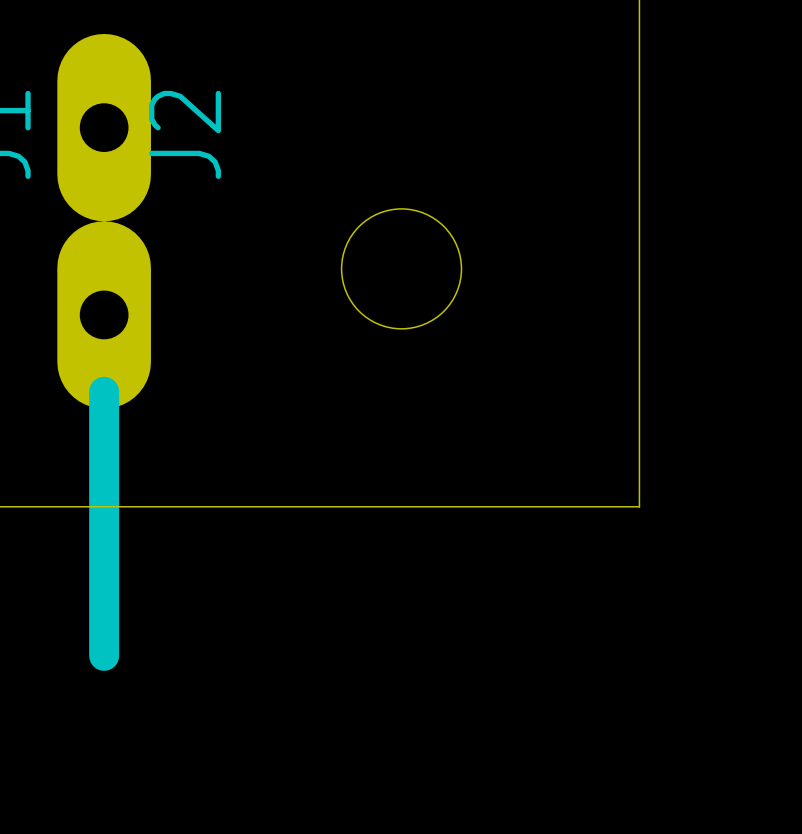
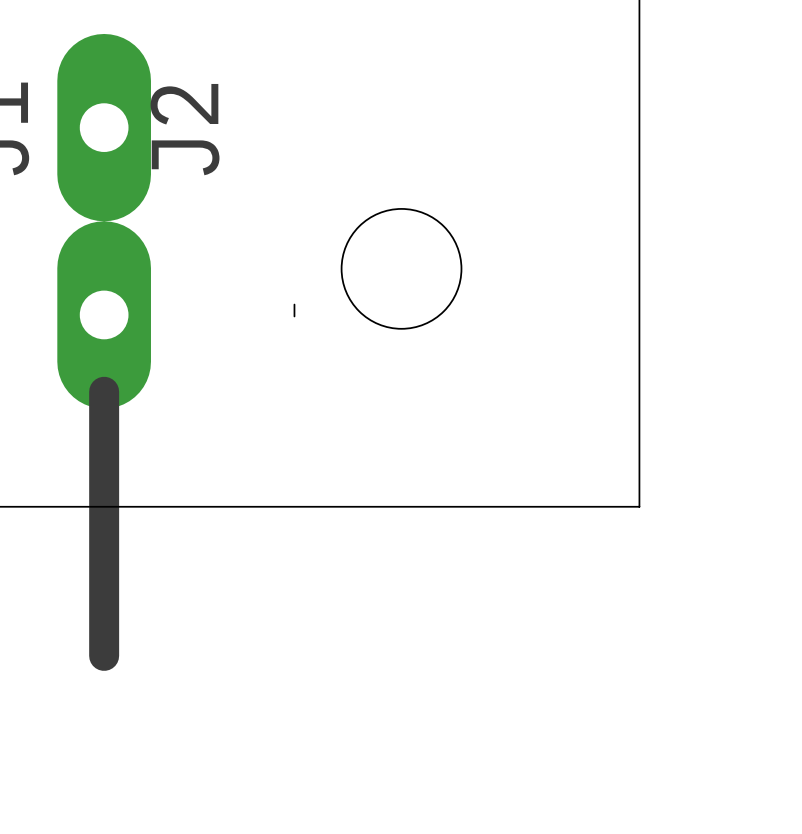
board edge: none -> (294, 304) (294, 316)

